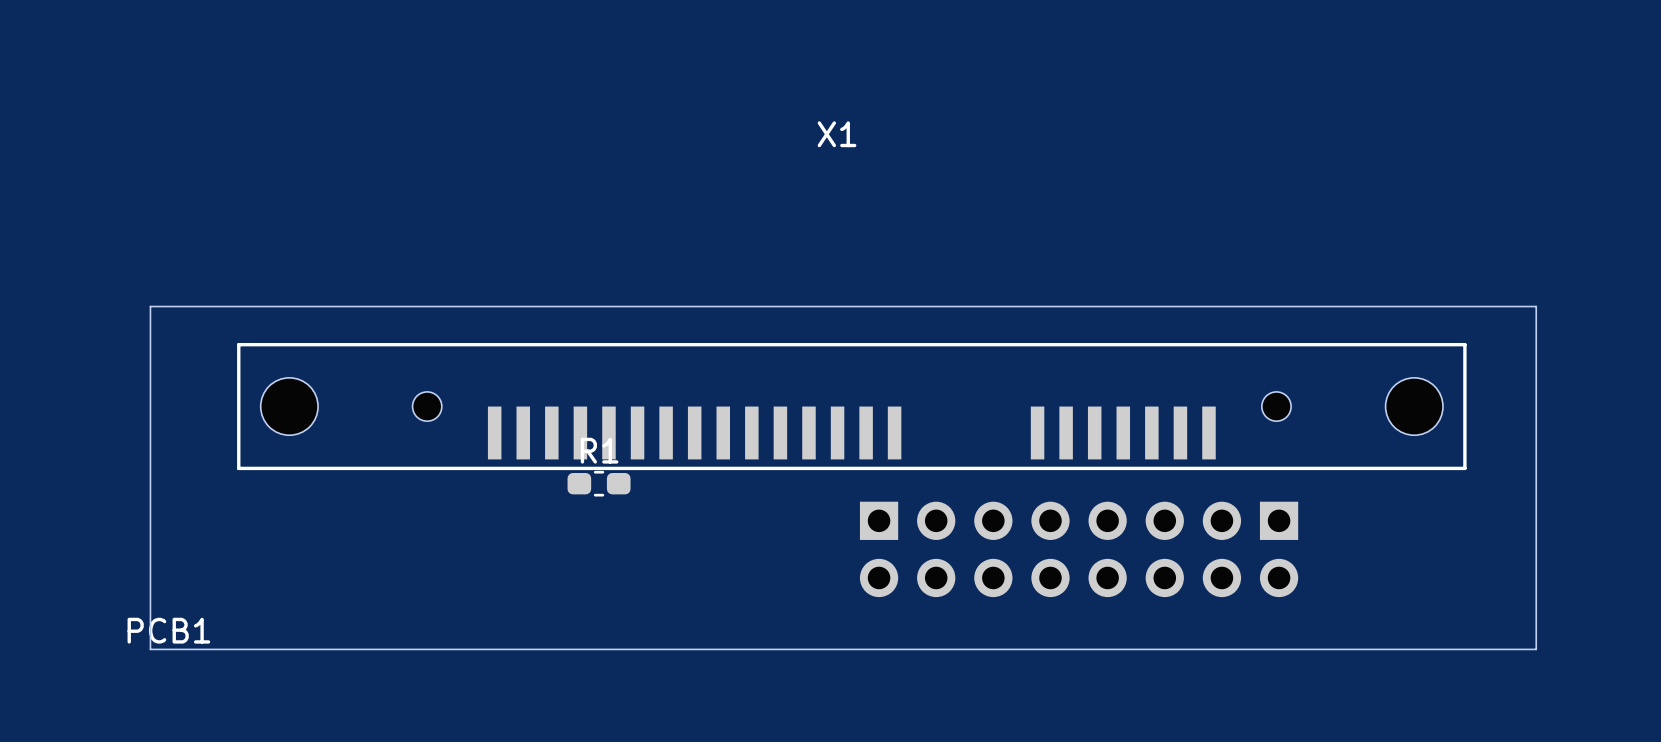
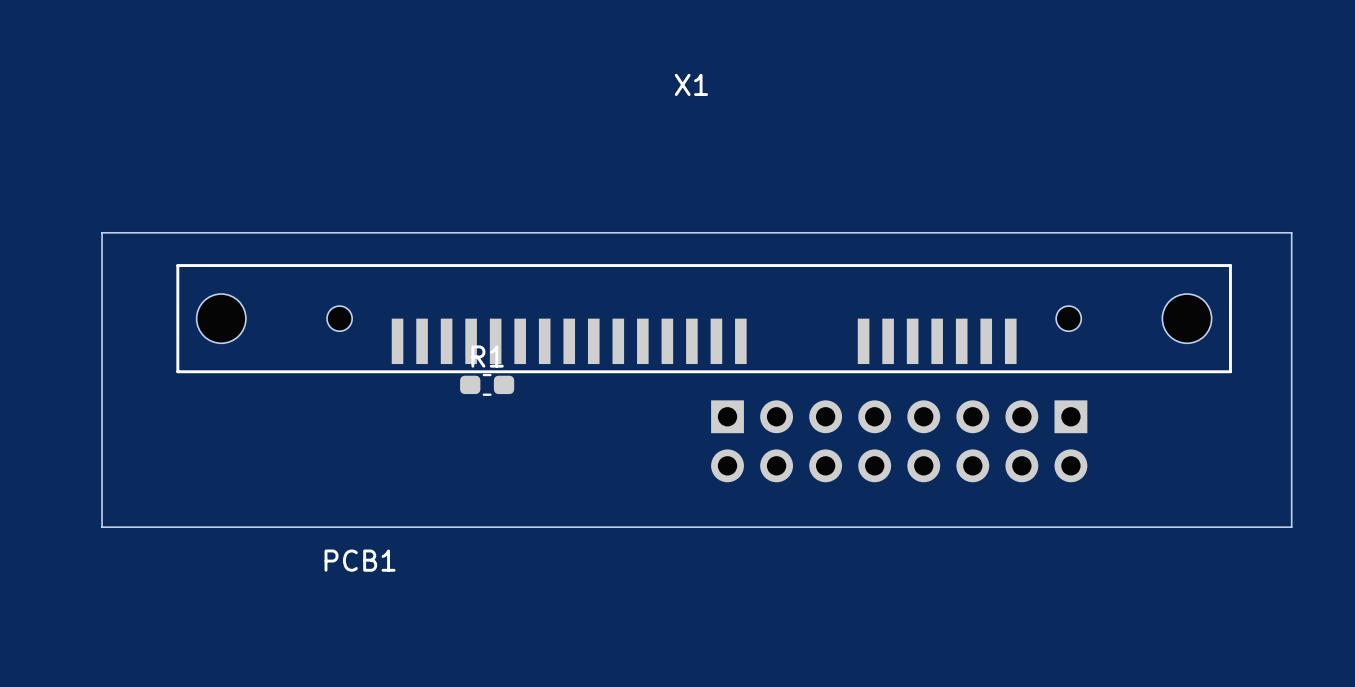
PCB1 position: (168, 630) -> (360, 560)

